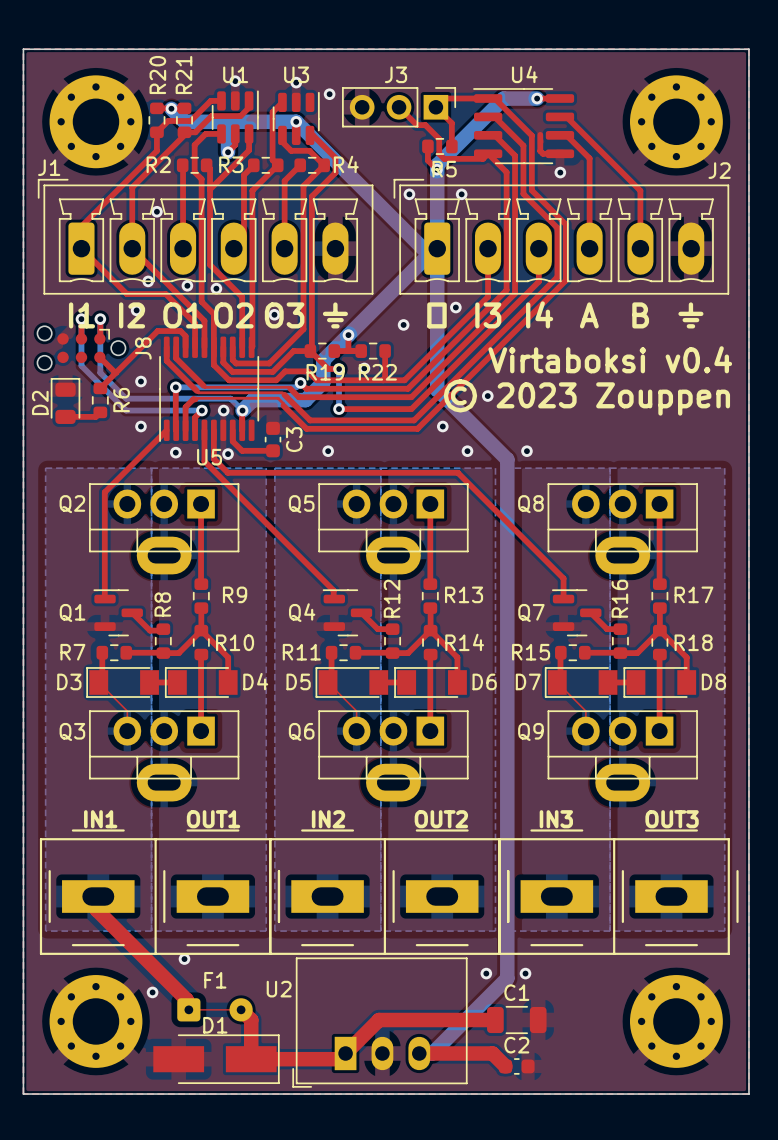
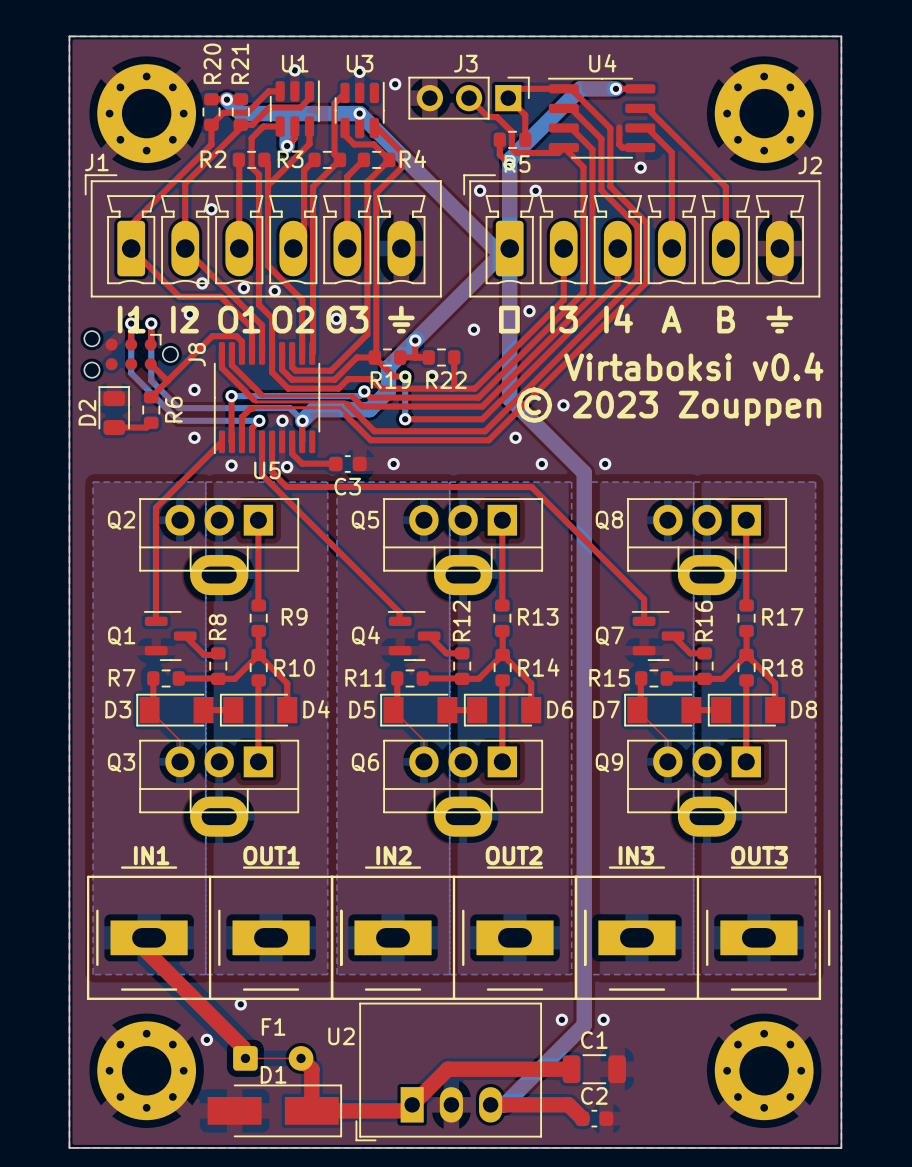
C3 rotation: 0° (273, 439) -> 90° clockwise (347, 464)

